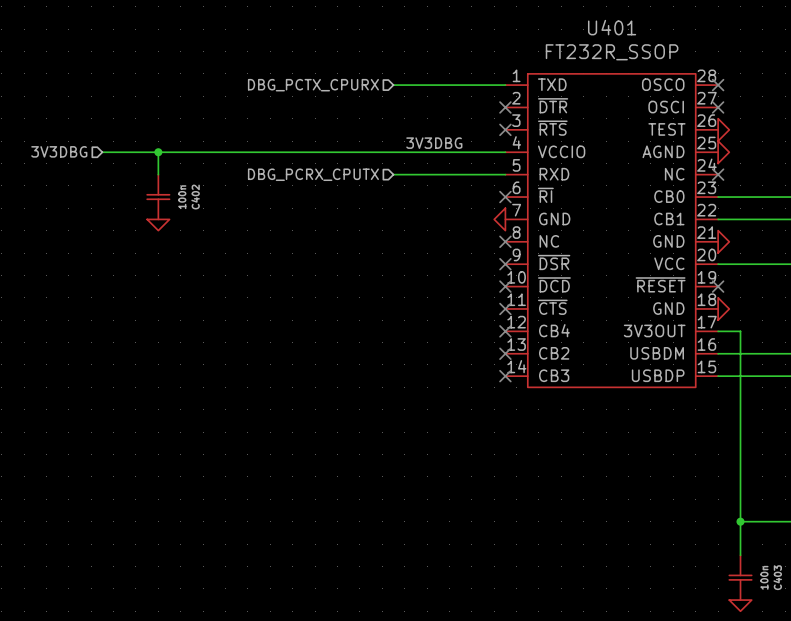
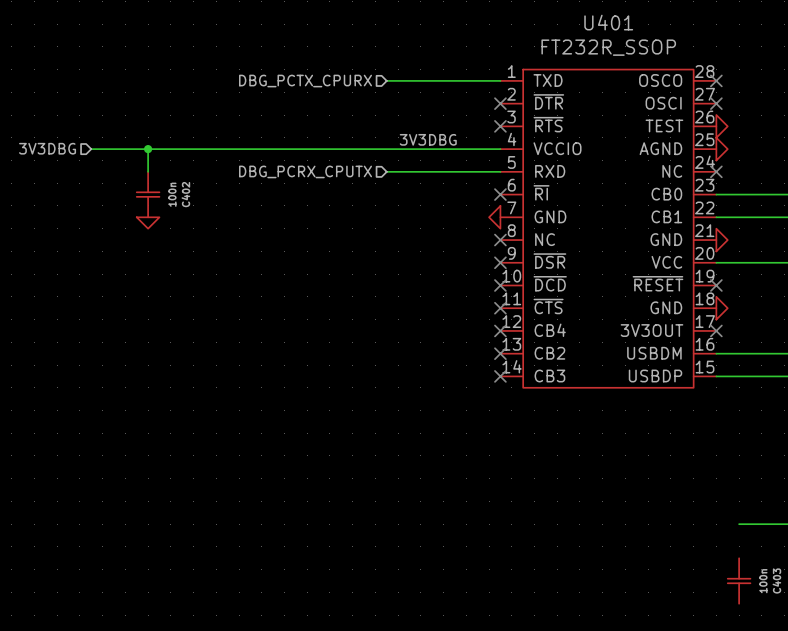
wire: (718, 331) (740, 331) (740, 555) -> none
no-connect mark: none -> (716, 330)
junction: (740, 521) -> none
power symbol: (740, 605) -> none

